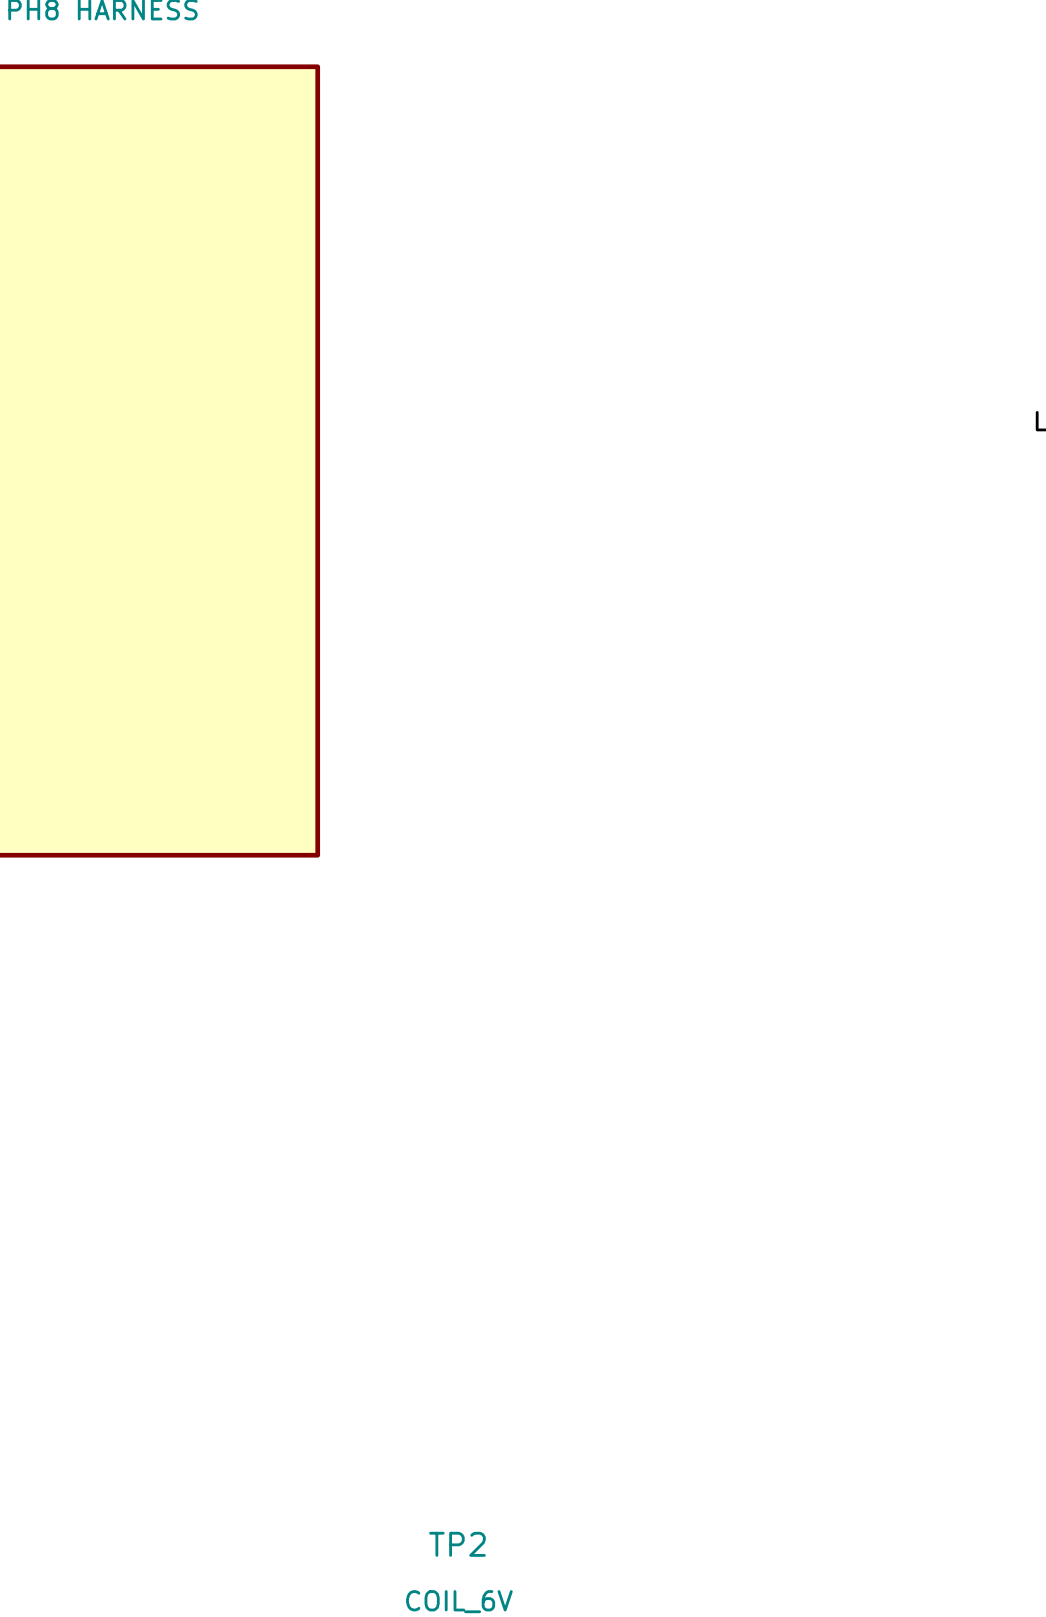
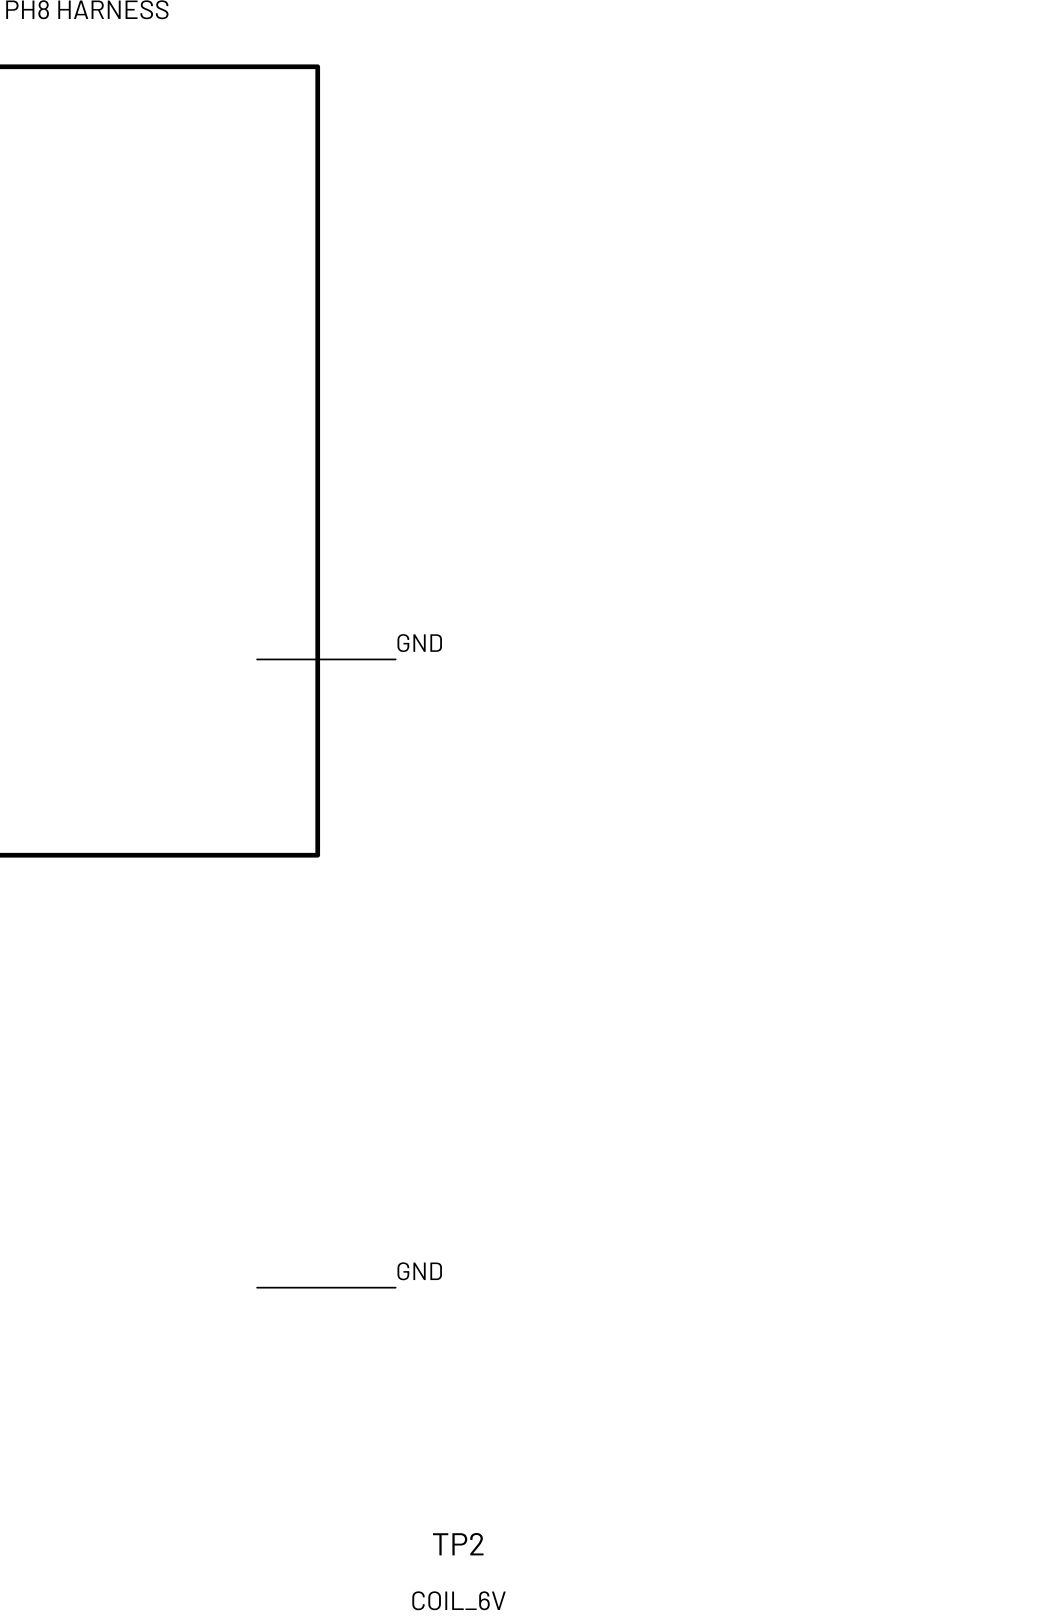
label: none -> GND (419, 643)
wire: none -> (257, 659) (395, 659)
label: none -> GND (419, 1271)
wire: none -> (257, 1287) (395, 1287)

